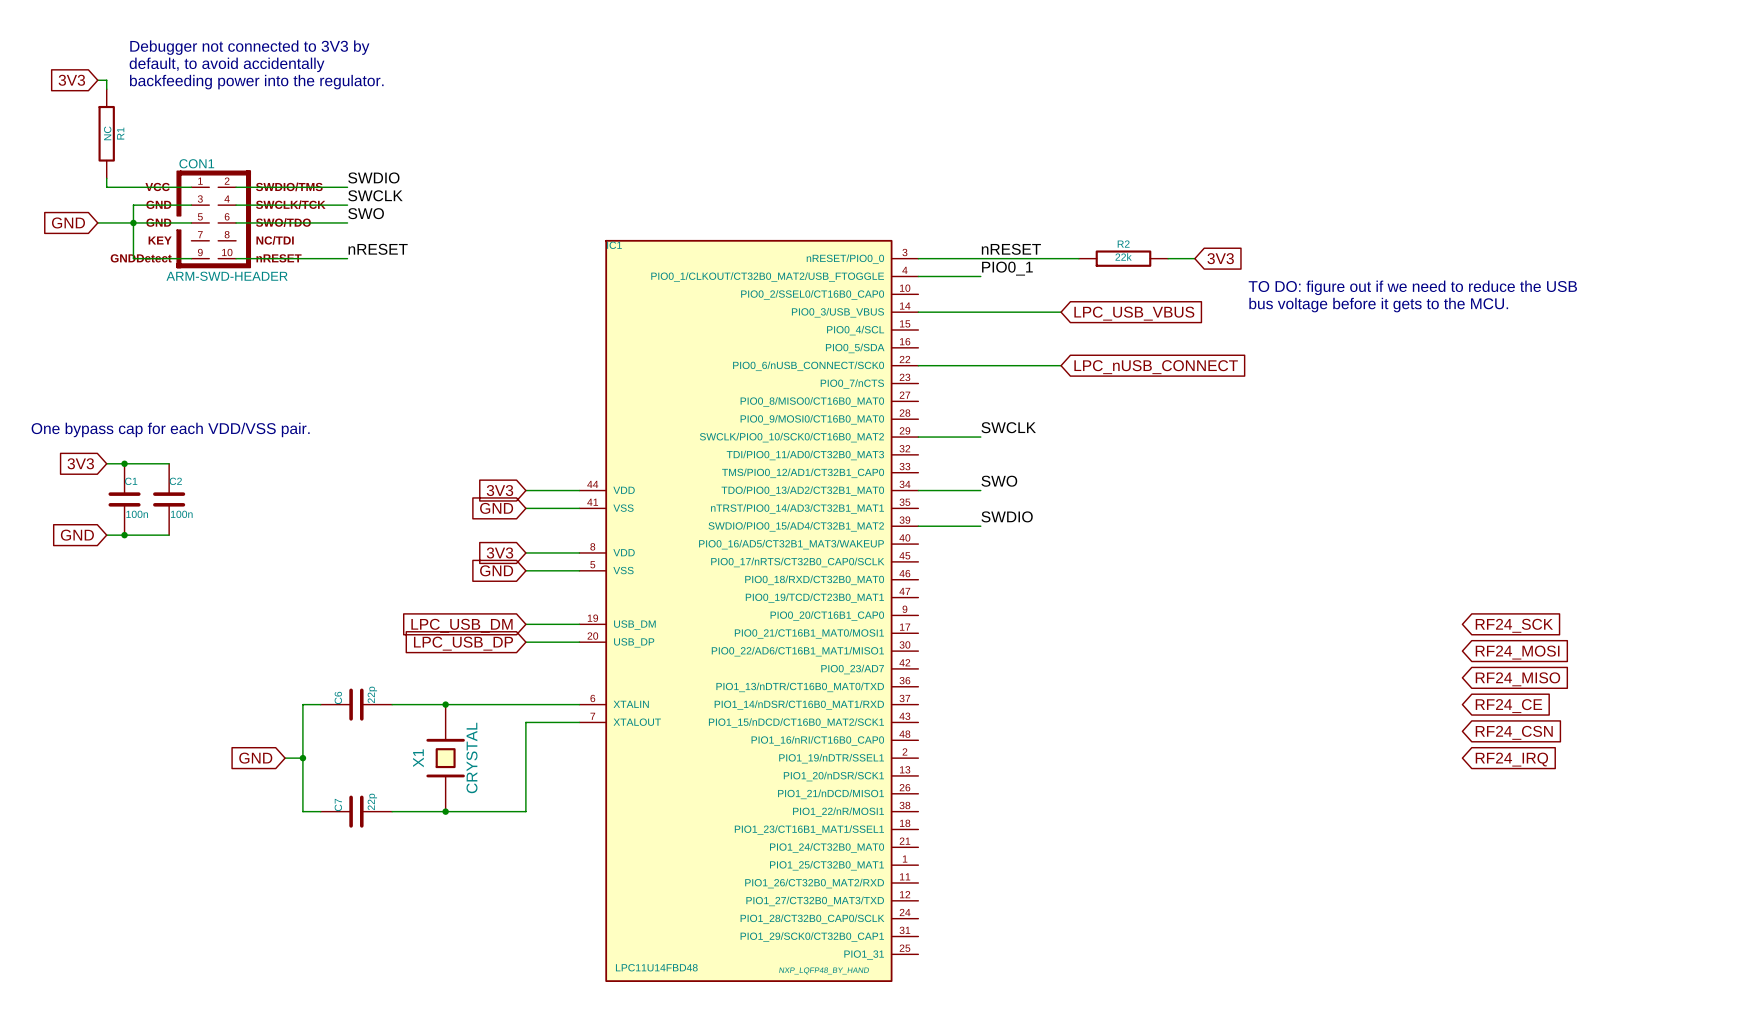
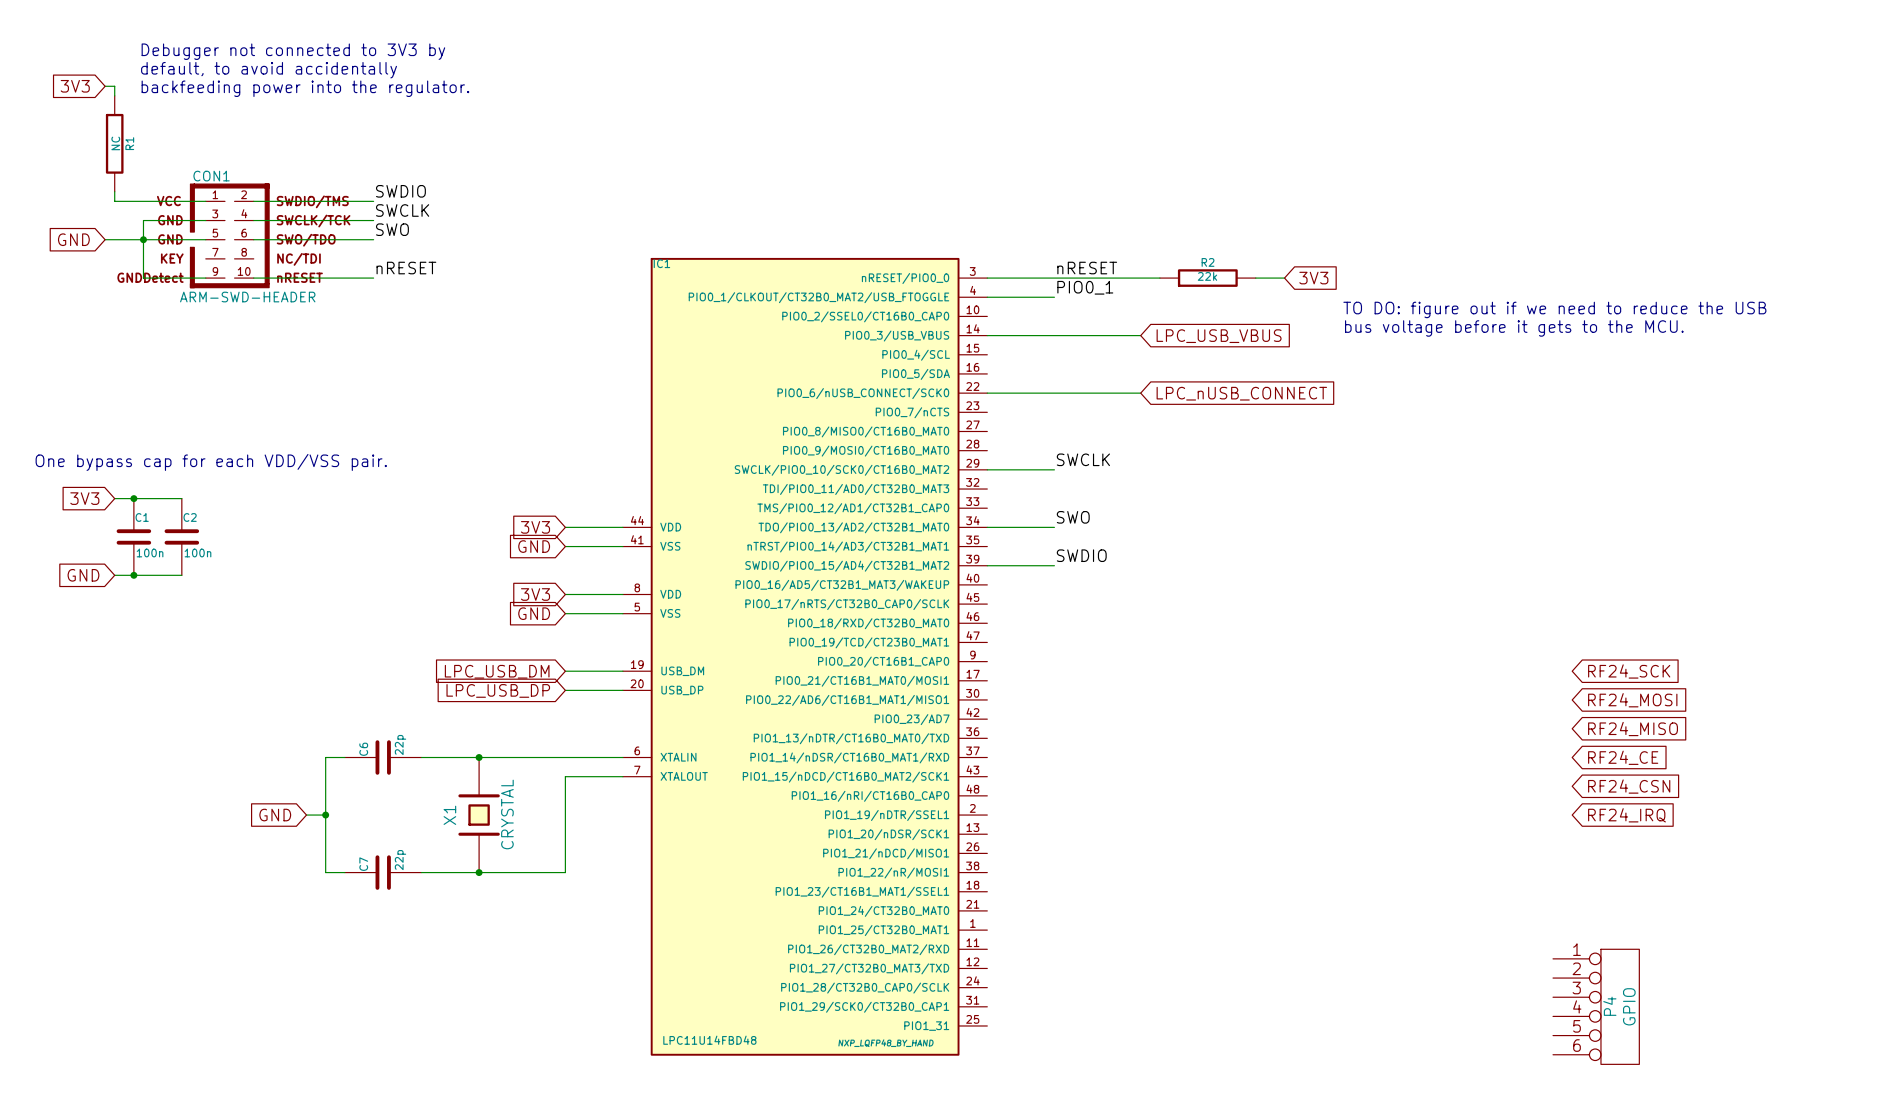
P4: none -> GPIO (1596, 1006)

